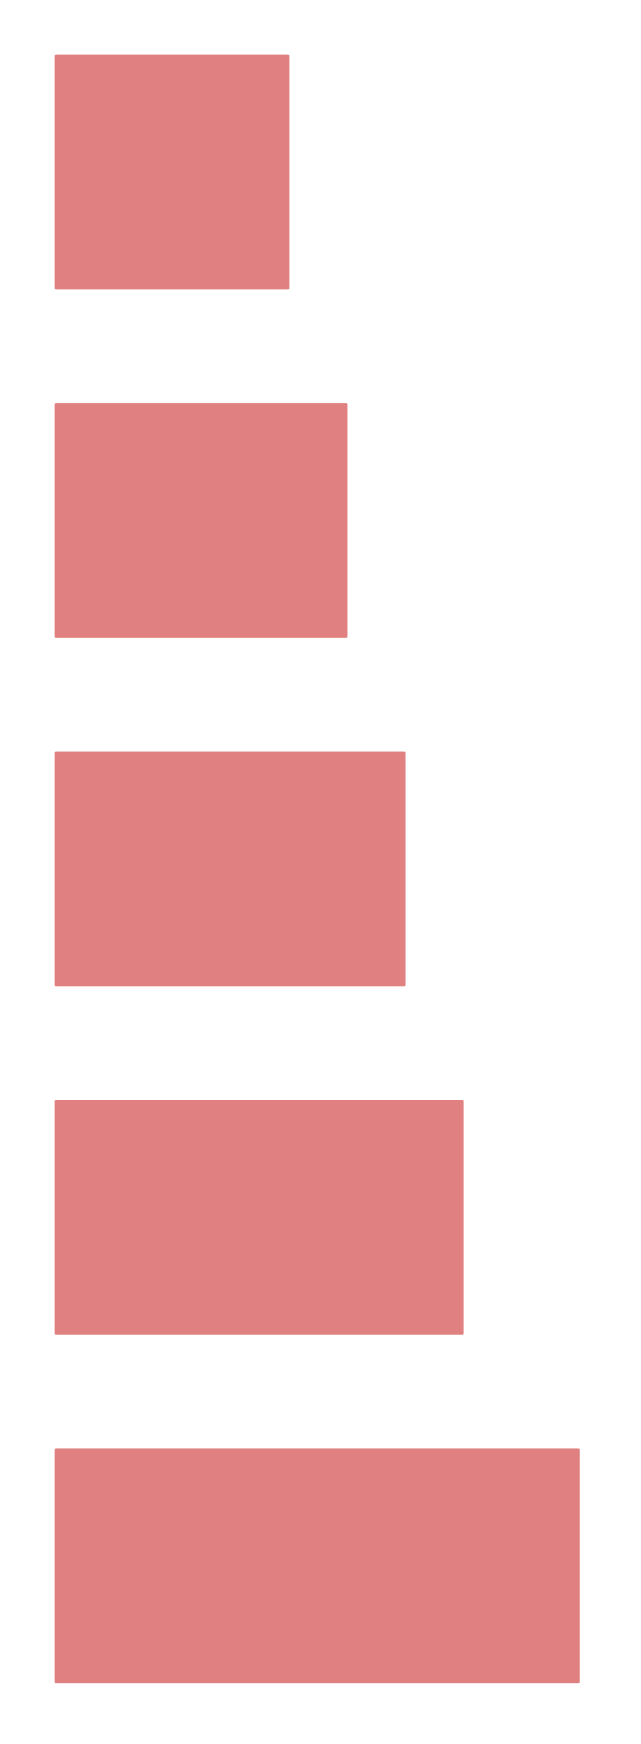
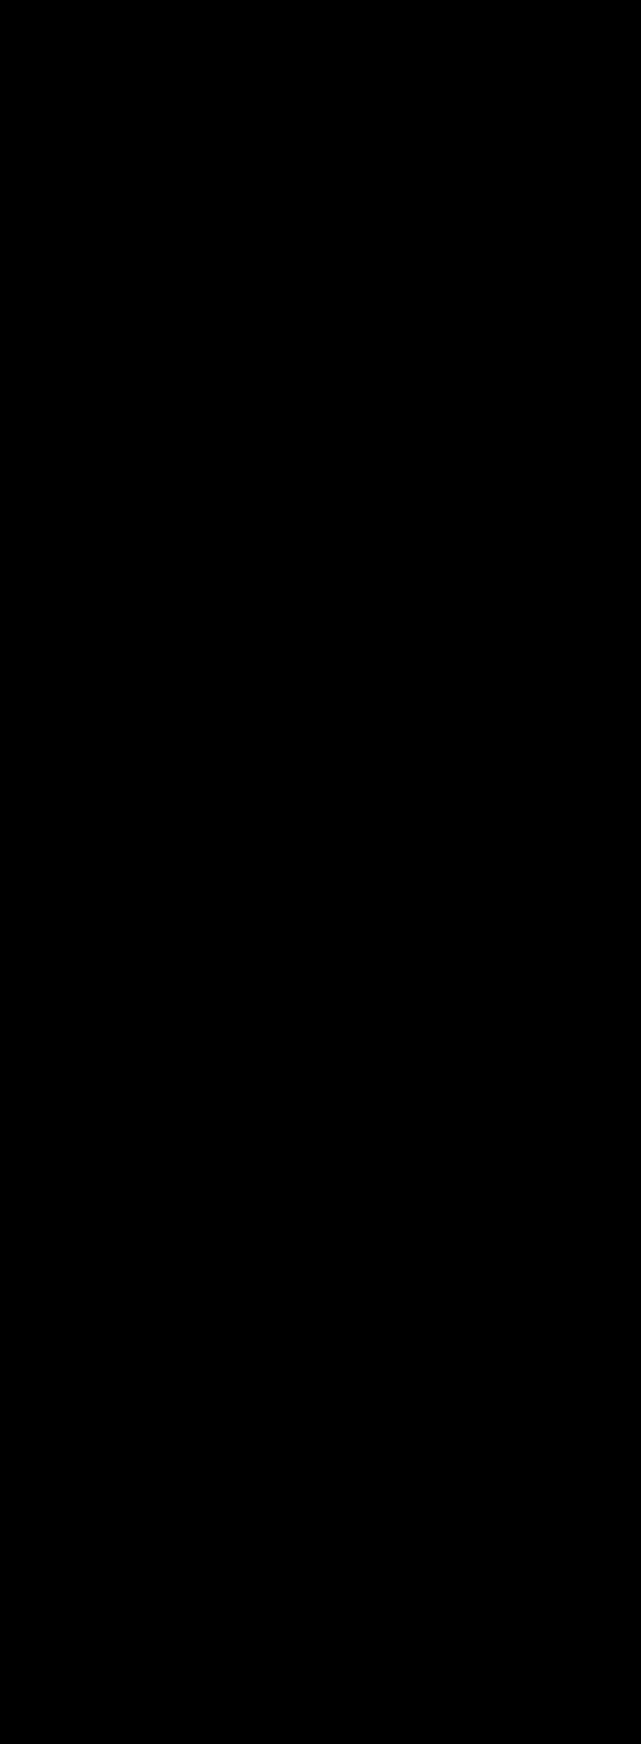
drawing: [54, 54, 290, 290] -> none
drawing: [54, 403, 348, 638] -> none
drawing: [54, 751, 406, 987] -> none
drawing: [54, 1099, 464, 1335] -> none
drawing: [54, 1448, 580, 1684] -> none

